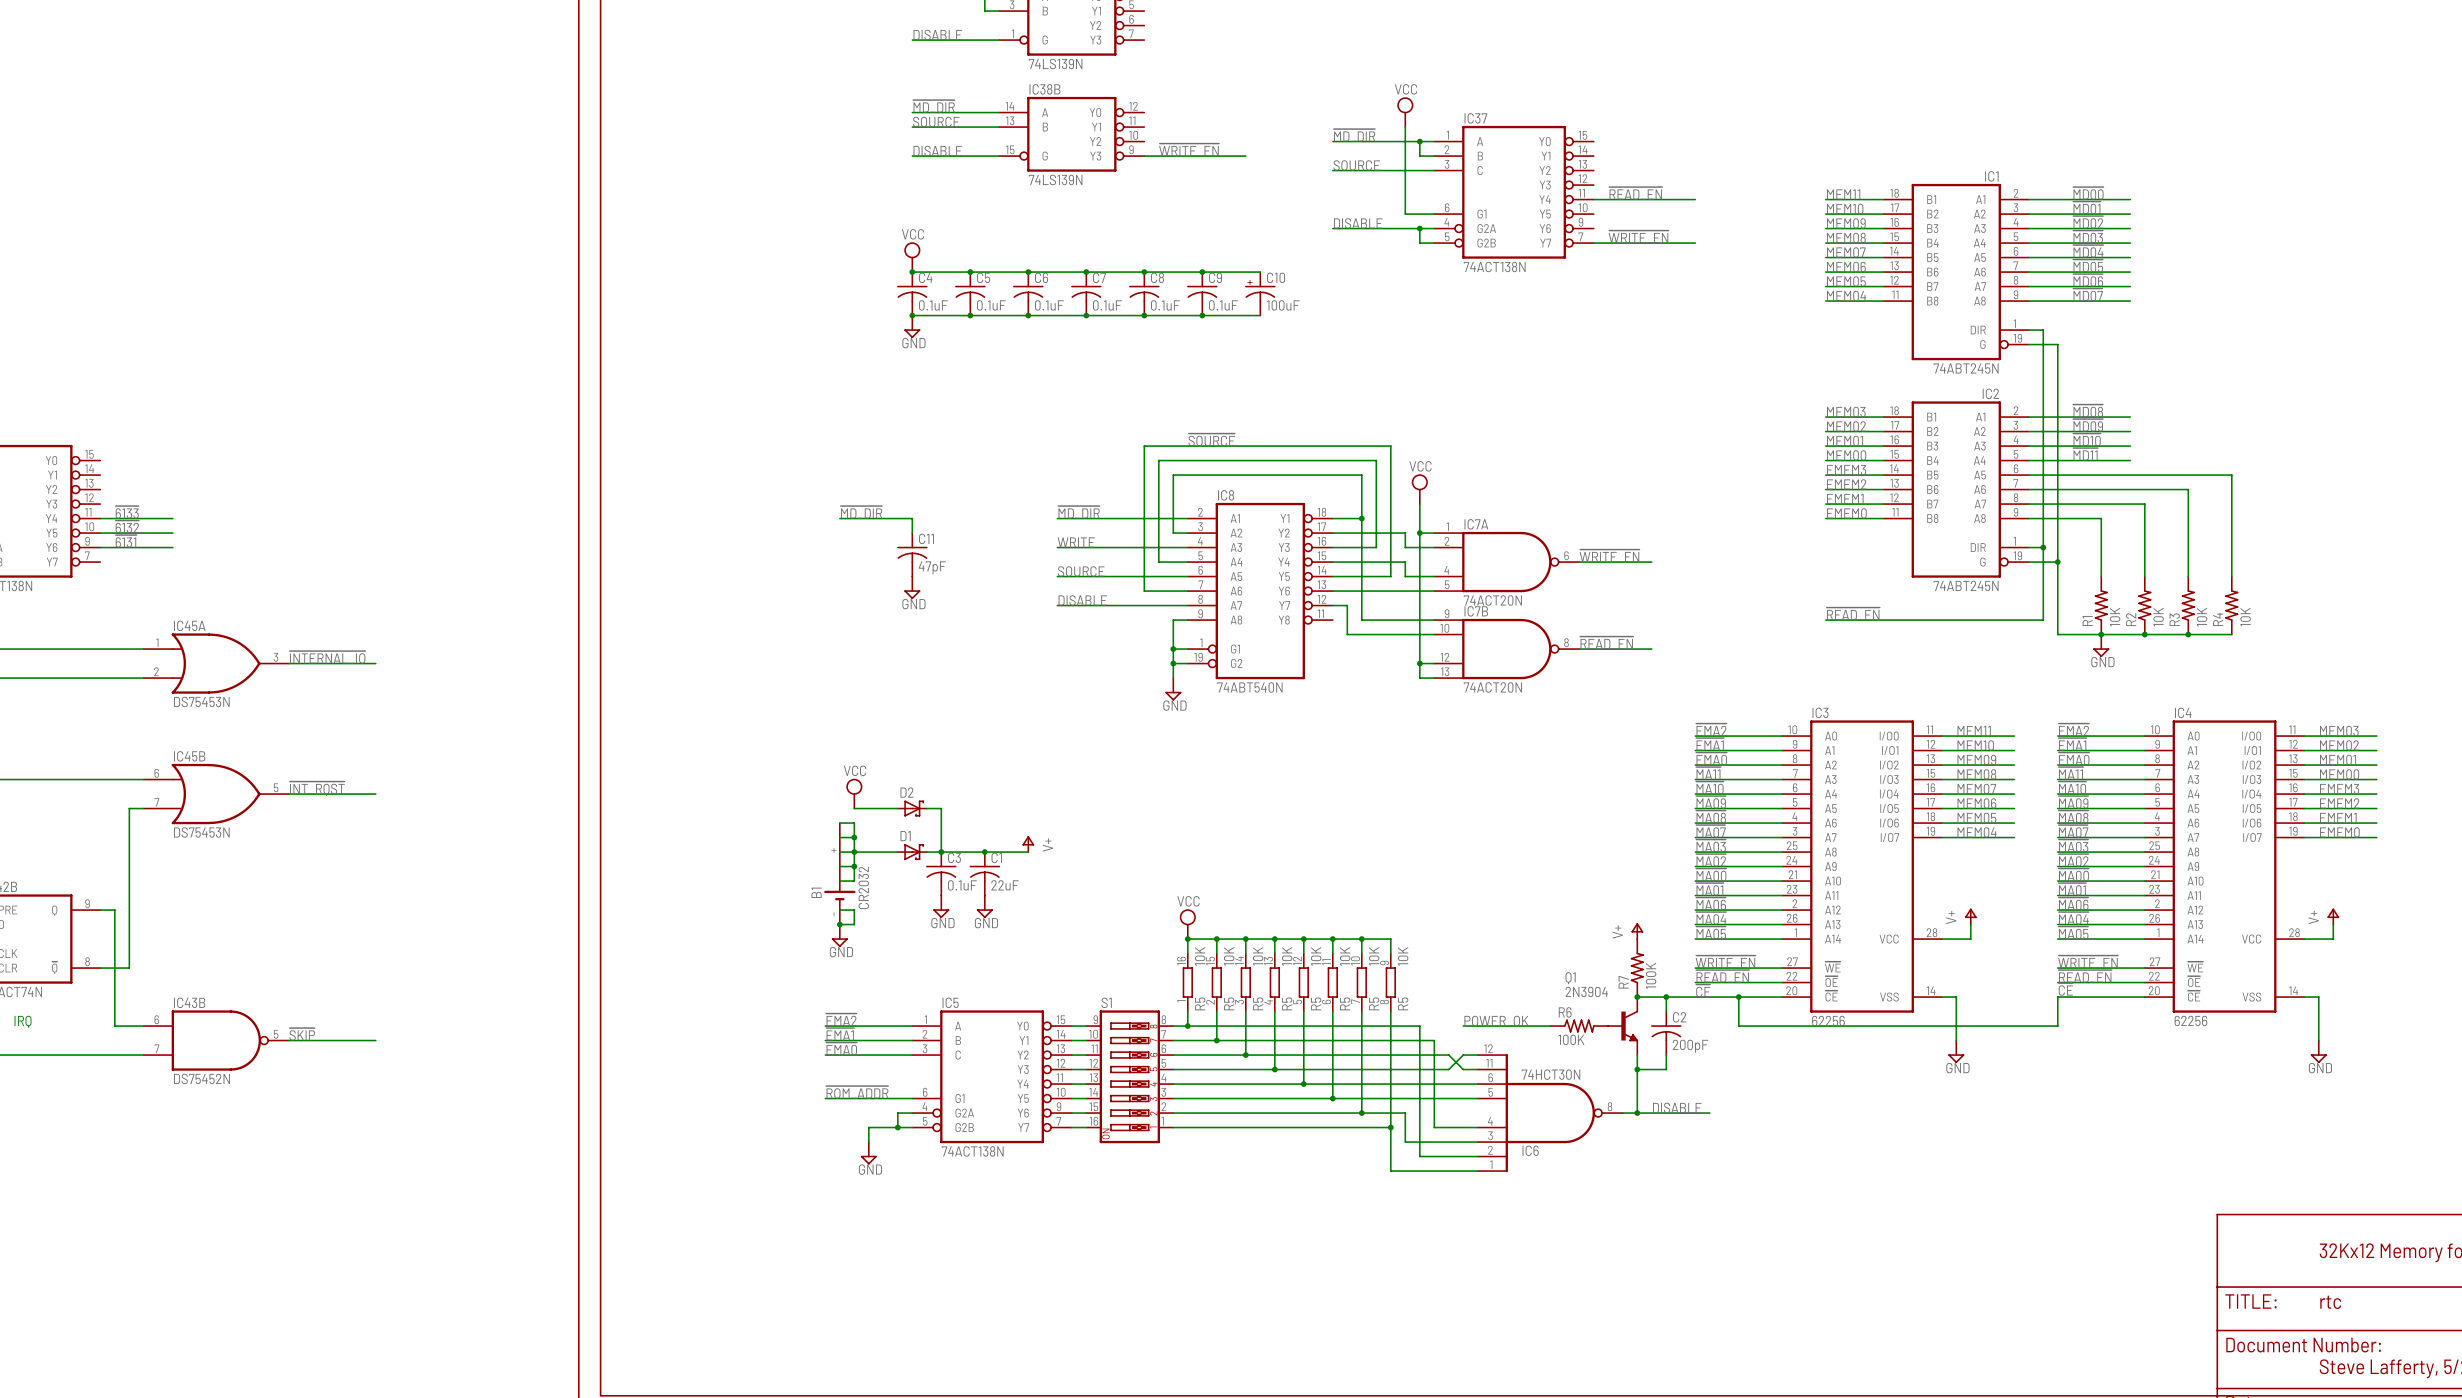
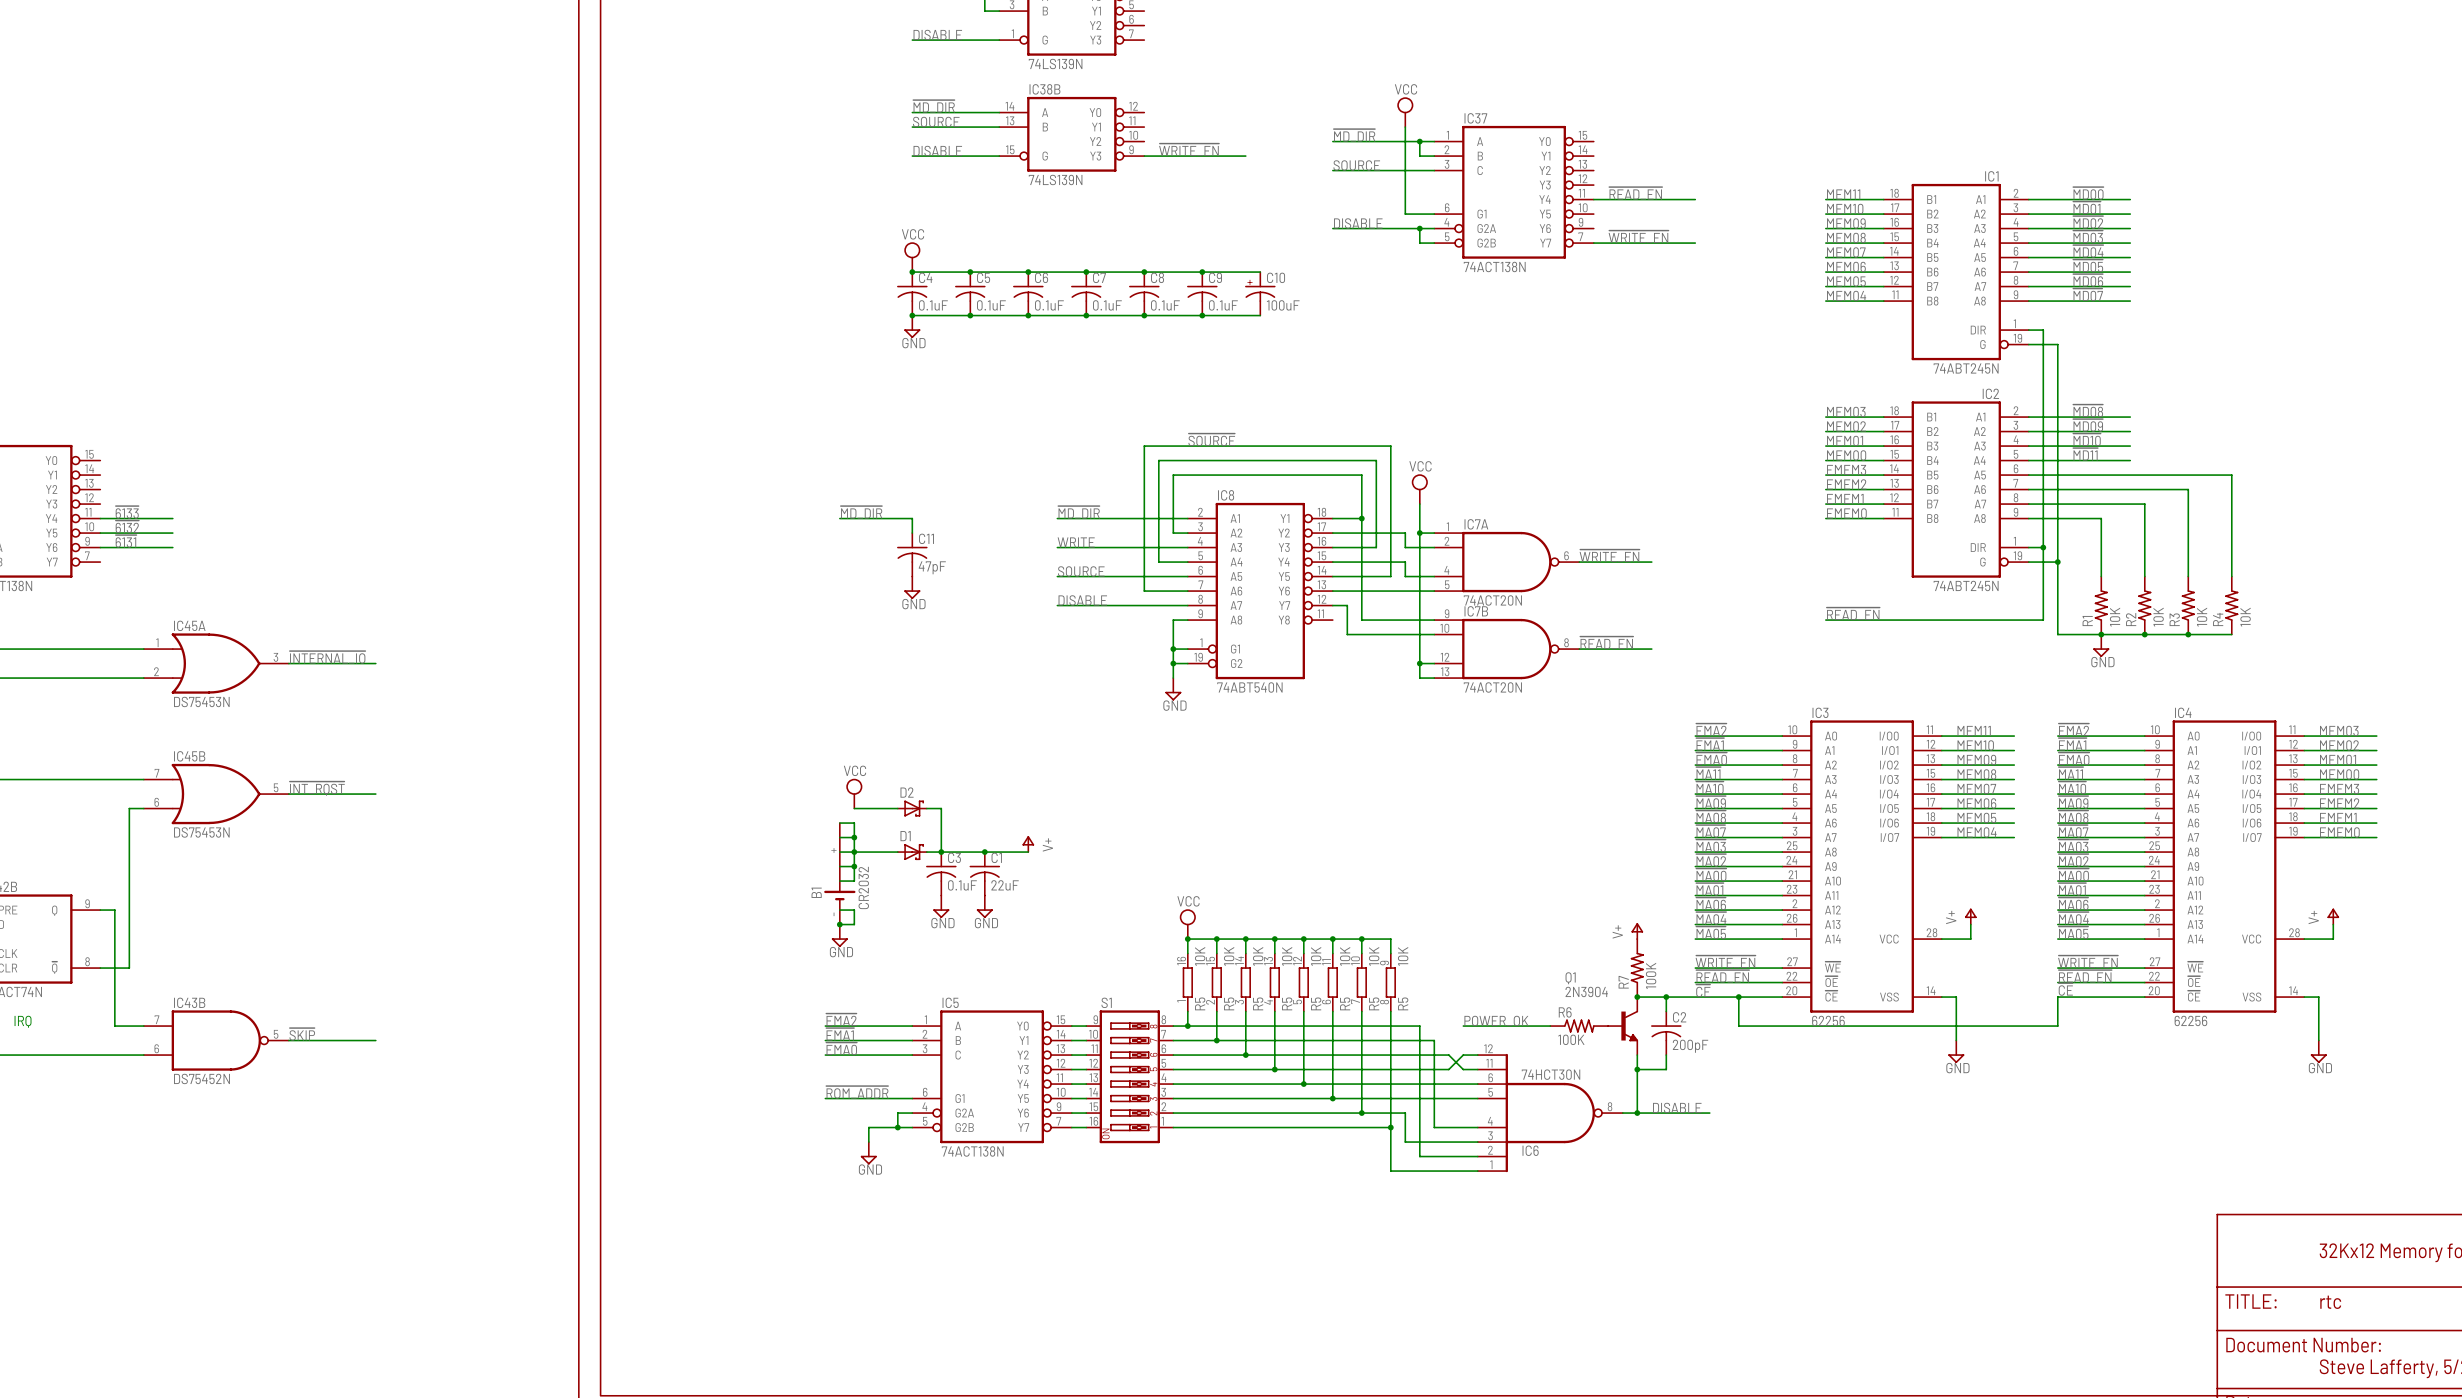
IC45B symbol: [143, 763, 289, 825] -> [143, 763, 289, 825]
IC43B flip: as is (216, 1040) -> up-down (216, 1040)

